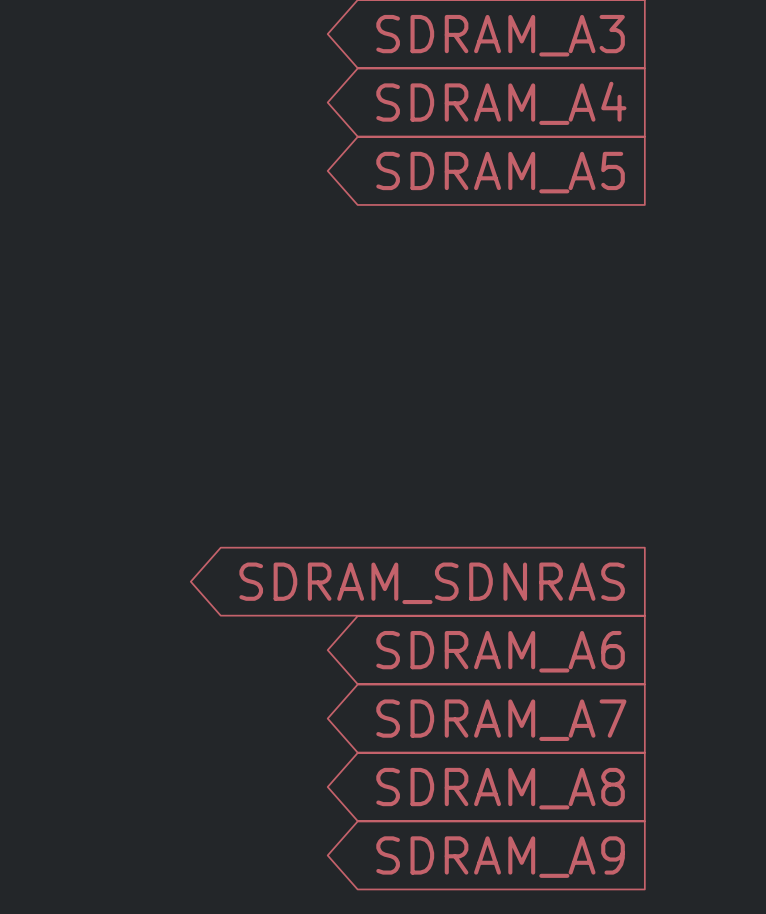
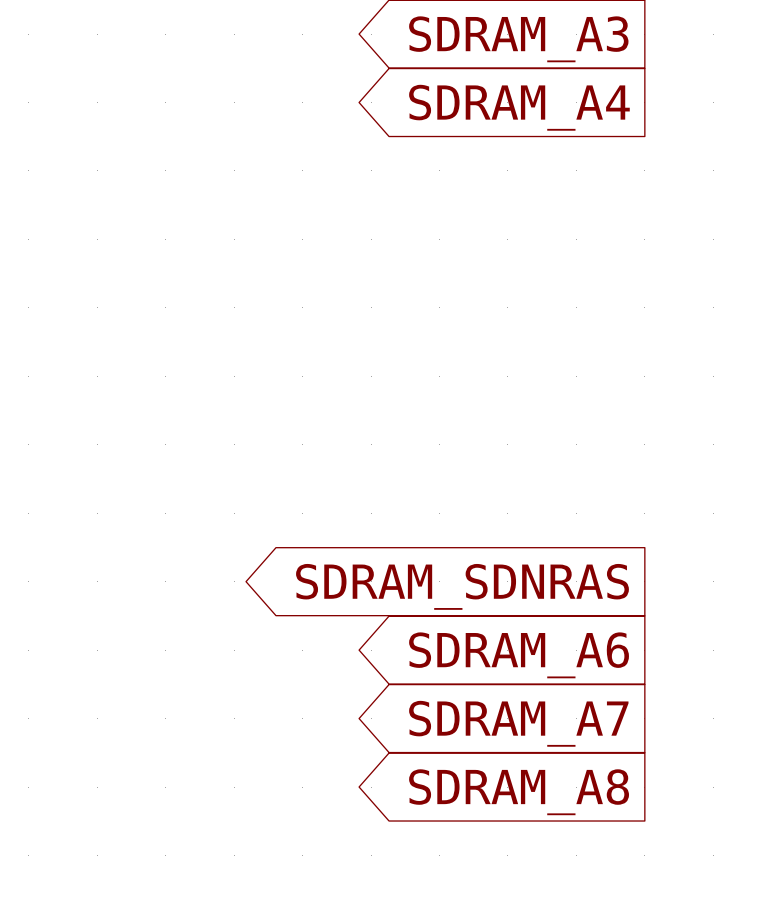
global label: SDRAM_A5 (500, 172) -> none
global label: SDRAM_A9 (500, 857) -> none

